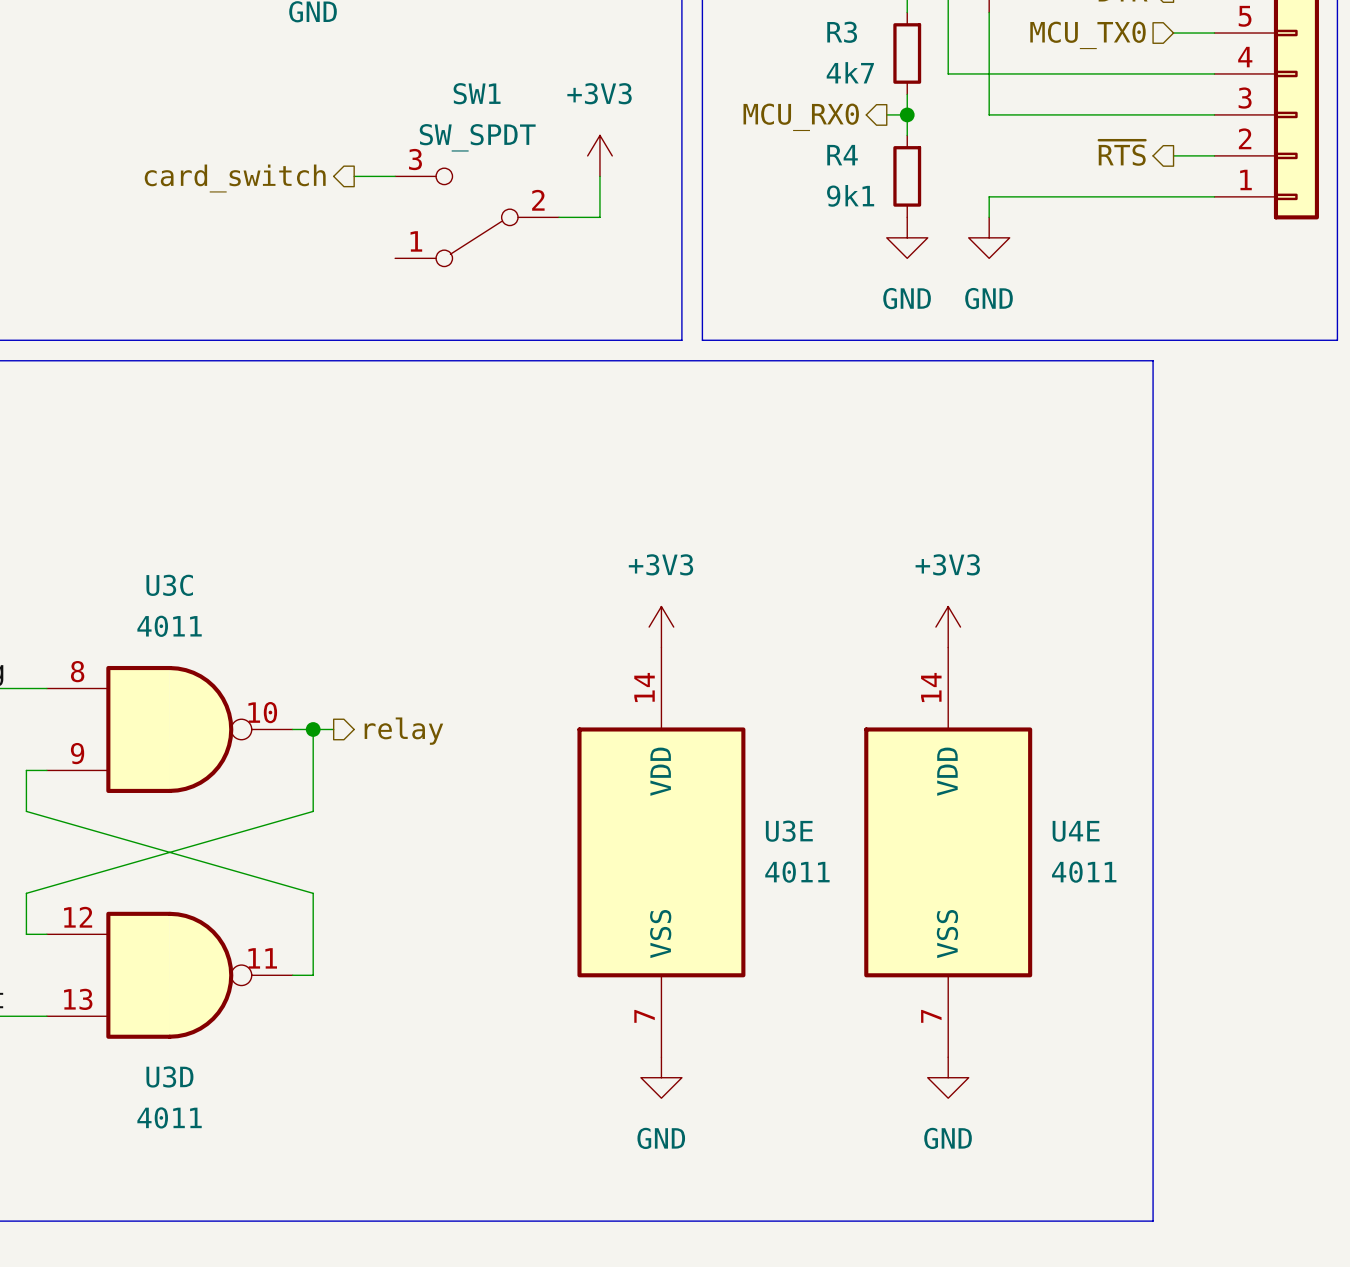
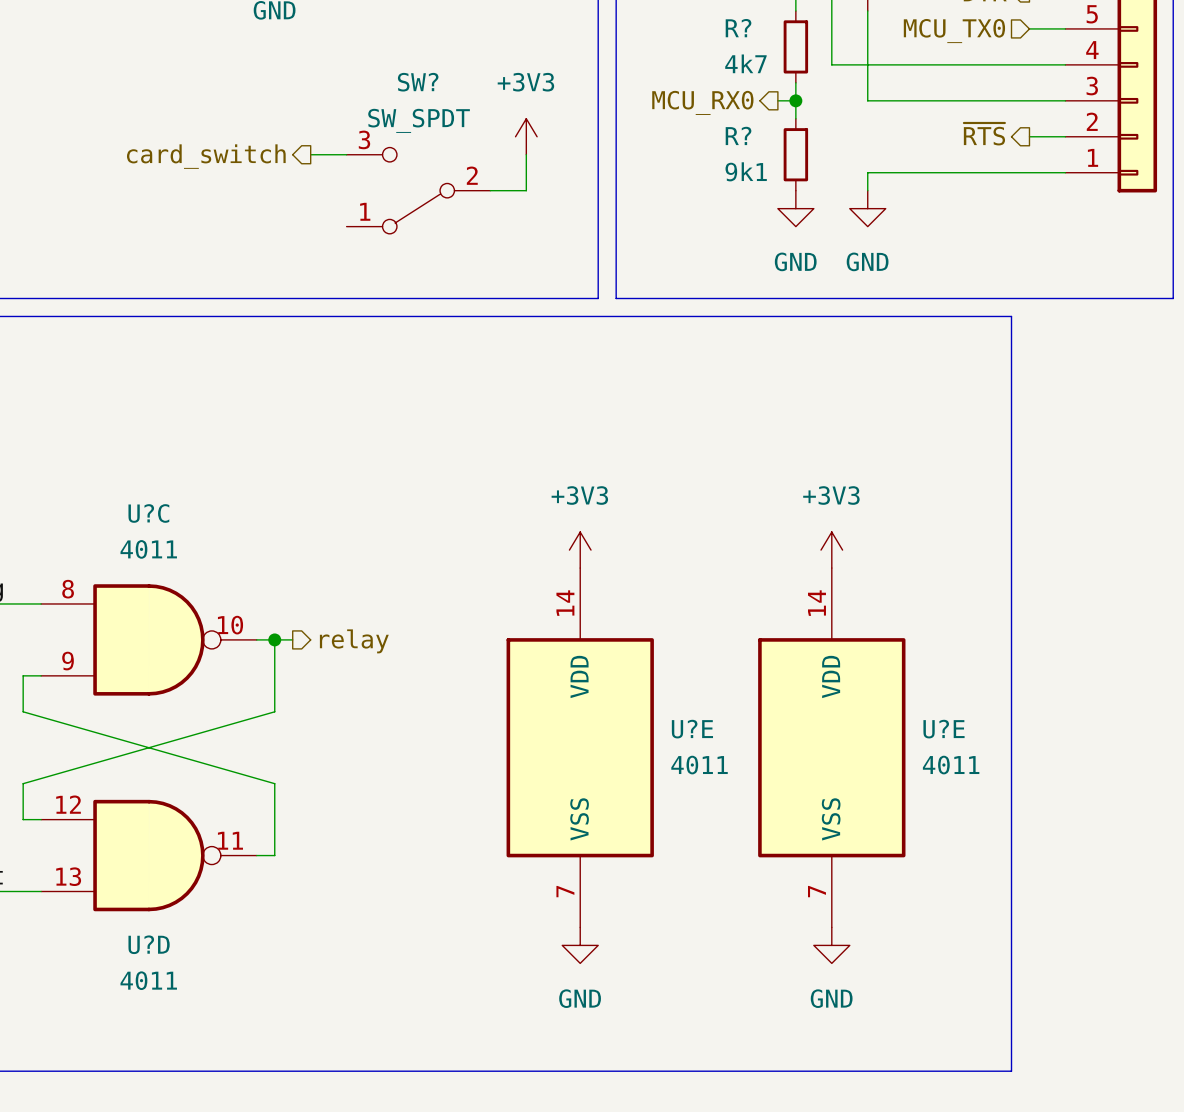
R3 name: R3 (842, 32) -> R? (738, 28)
SW1 name: SW1 (477, 93) -> SW? (418, 82)
R4 name: R4 (842, 155) -> R? (738, 135)
U3C name: U3C (169, 585) -> U?C (148, 513)
U3E name: U3E (789, 831) -> U?E (692, 729)
U4E name: U4E (1076, 831) -> U?E (944, 729)
U3D name: U3D (169, 1076) -> U?D (149, 944)

